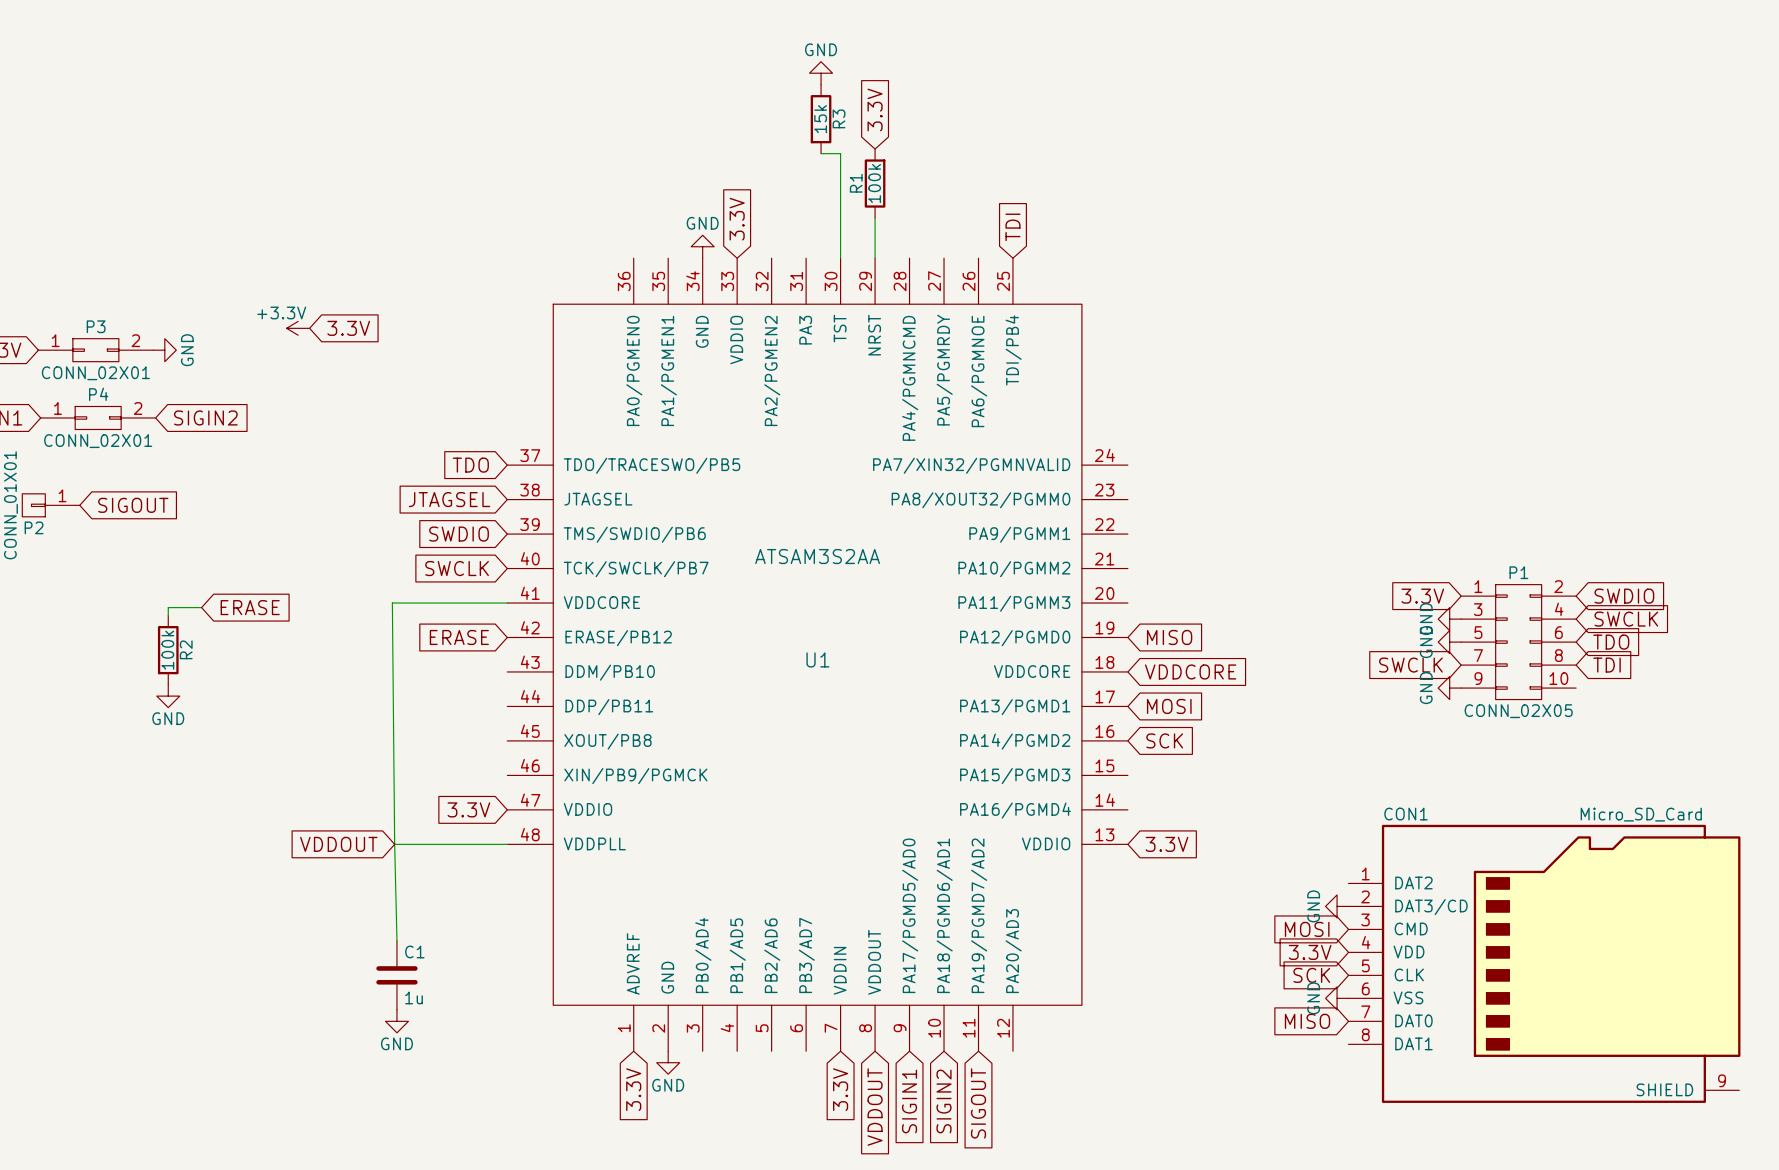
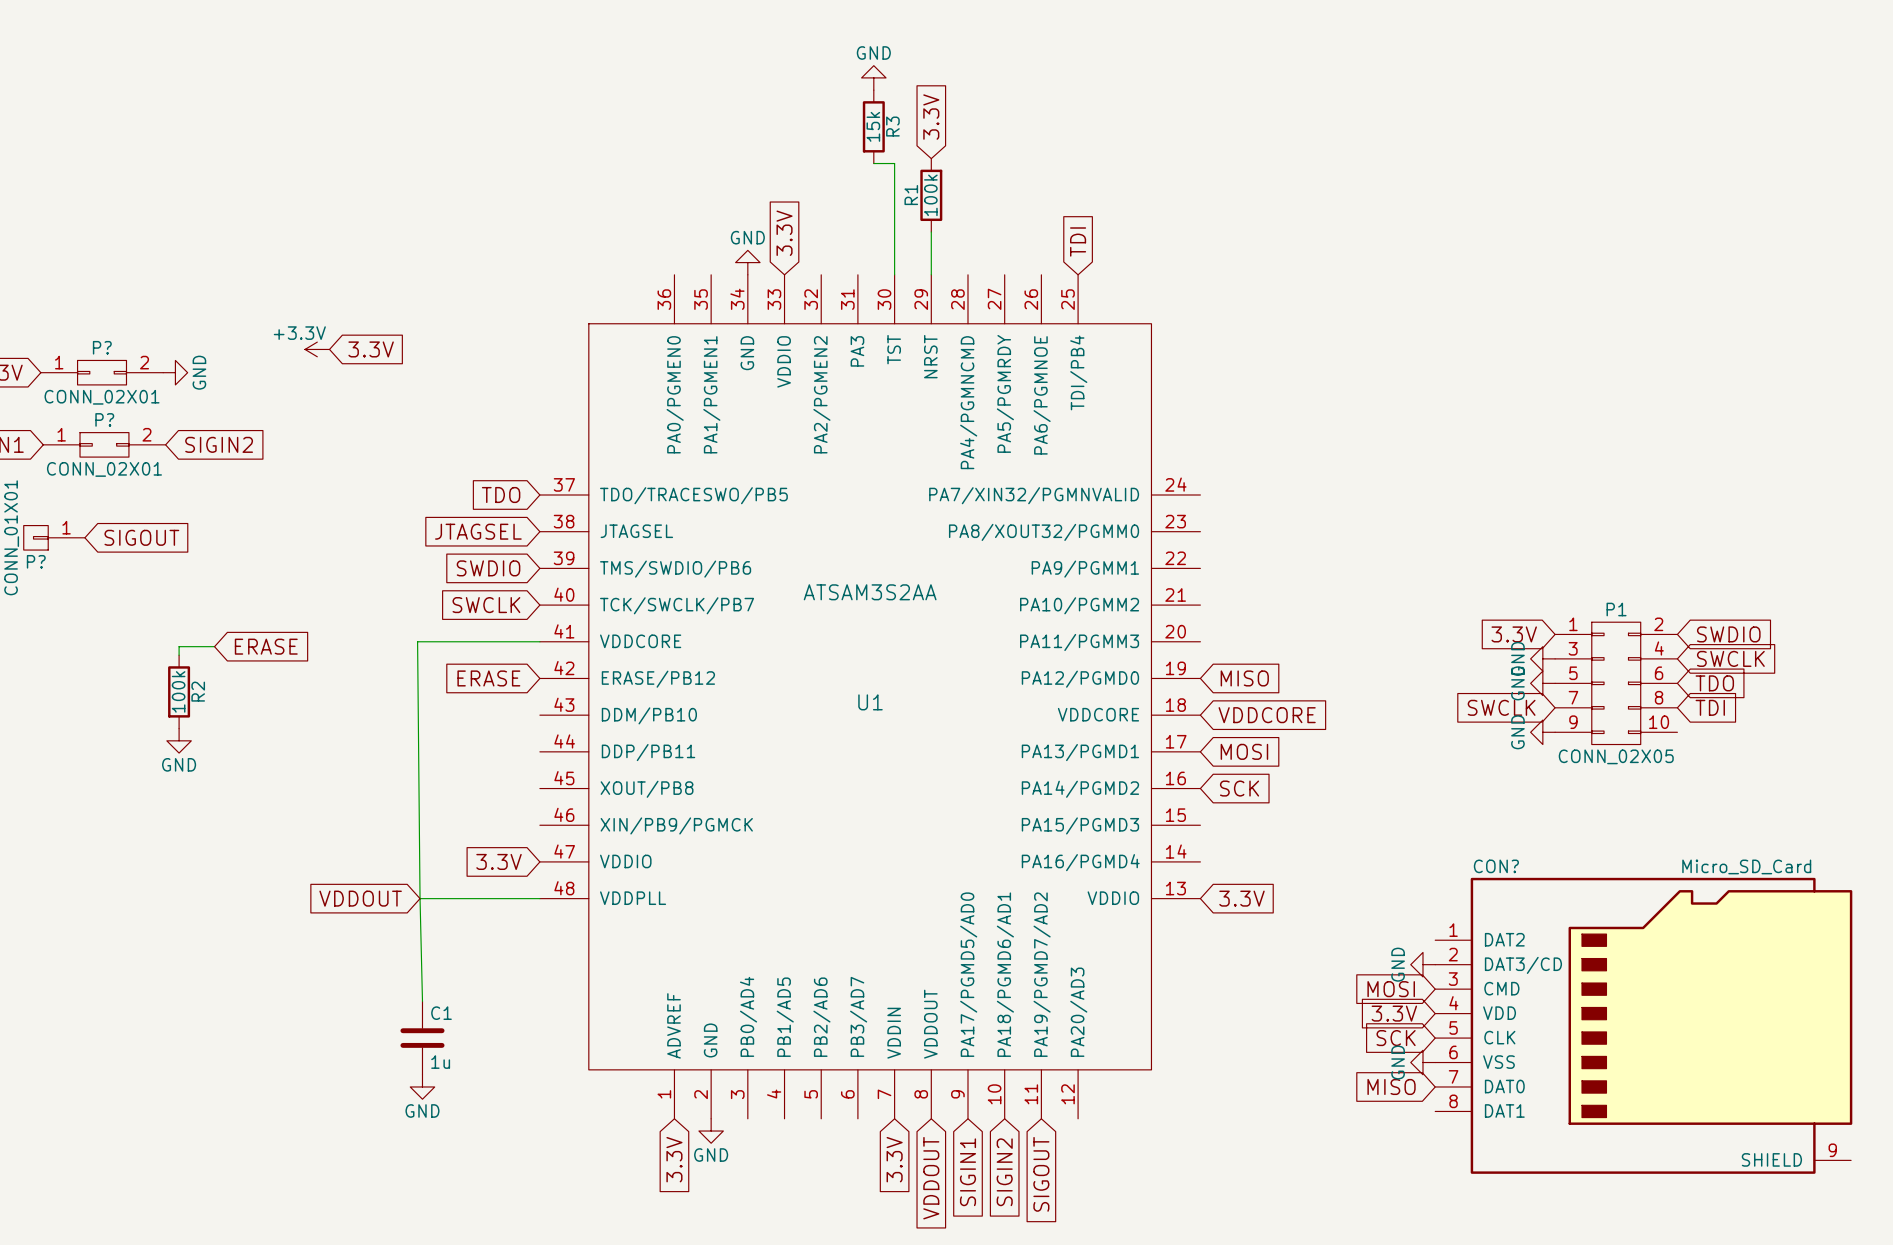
P3 name: P3 (96, 326) -> P? (102, 347)
P4 name: P4 (98, 394) -> P? (104, 419)
P2 name: P2 (34, 527) -> P? (36, 561)
CON1 name: CON1 (1406, 814) -> CON? (1496, 866)

